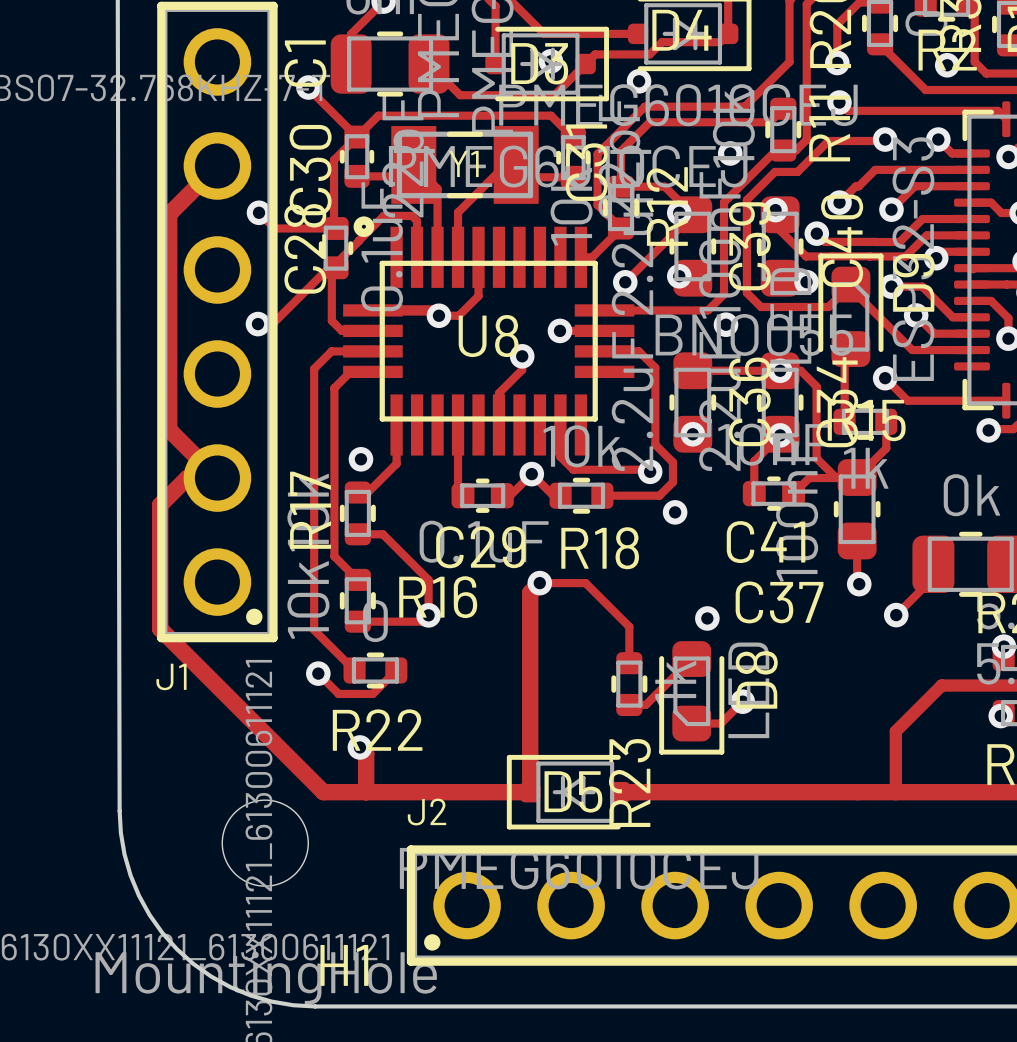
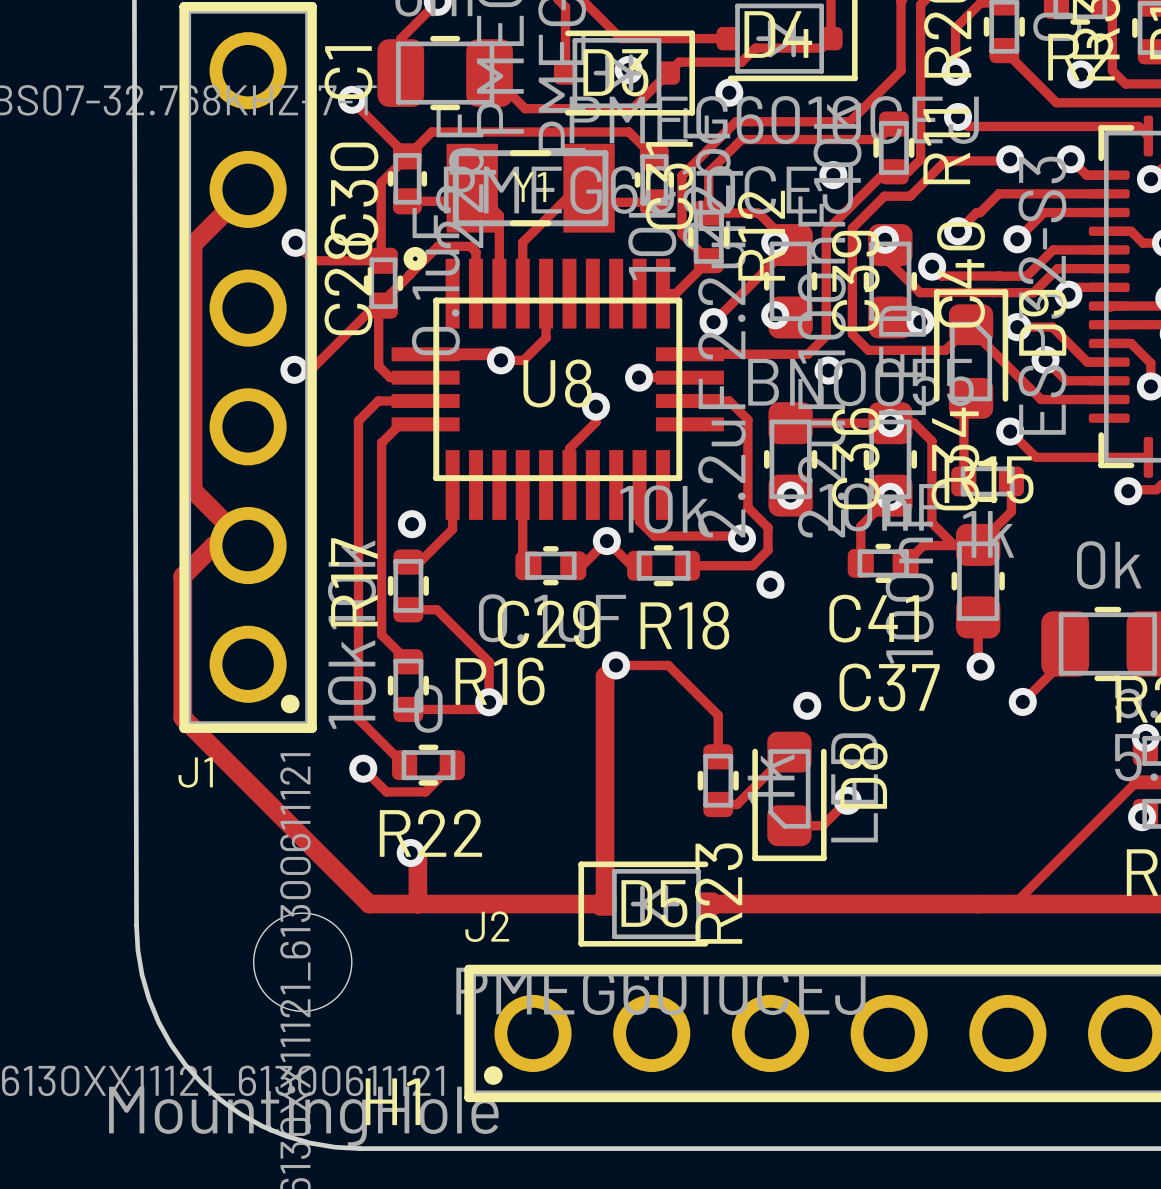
track: (995, 685) (941, 685) (895, 731) (895, 792) -> (1136, 782) (1014, 904)

